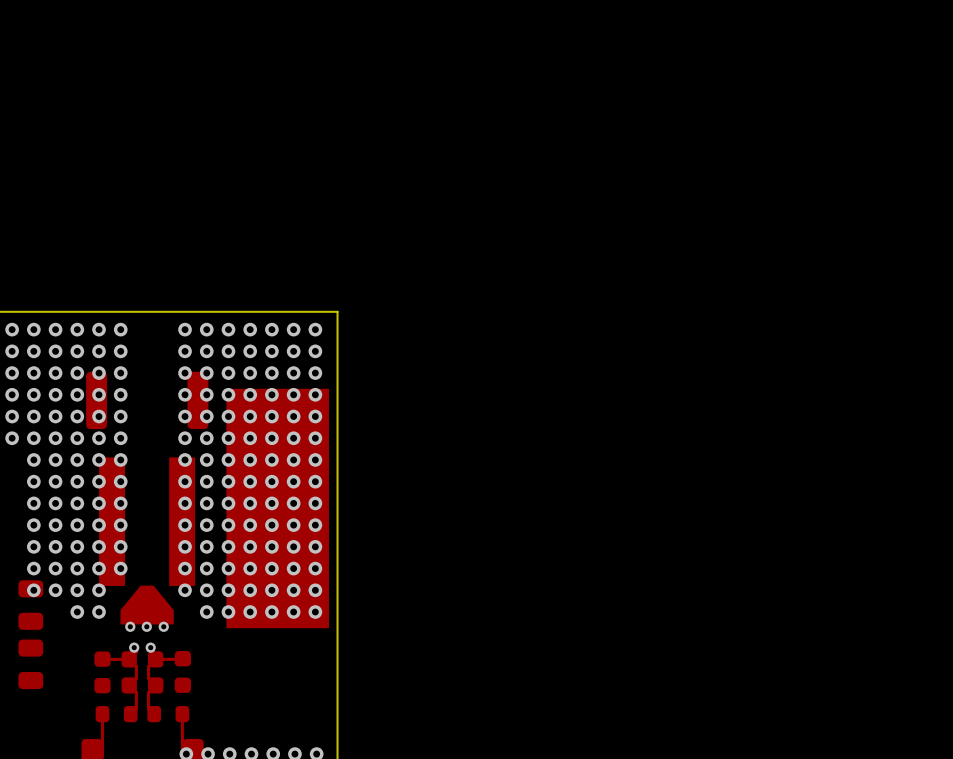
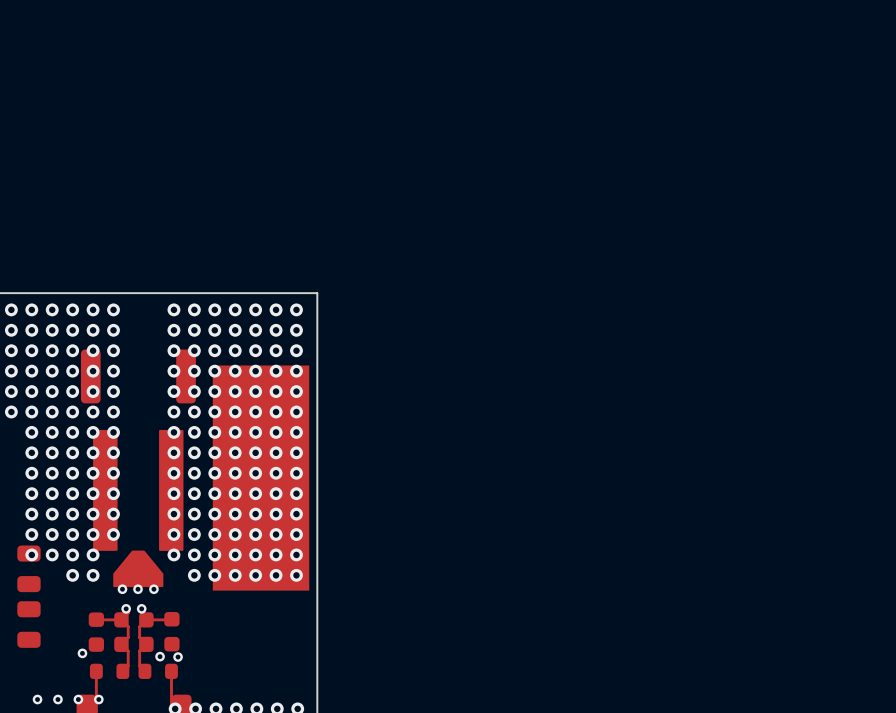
via: none -> (82, 653)
via: none -> (160, 656)
via: none -> (178, 657)
via: none -> (37, 699)
via: none -> (57, 699)
via: none -> (78, 699)
via: none -> (98, 699)

